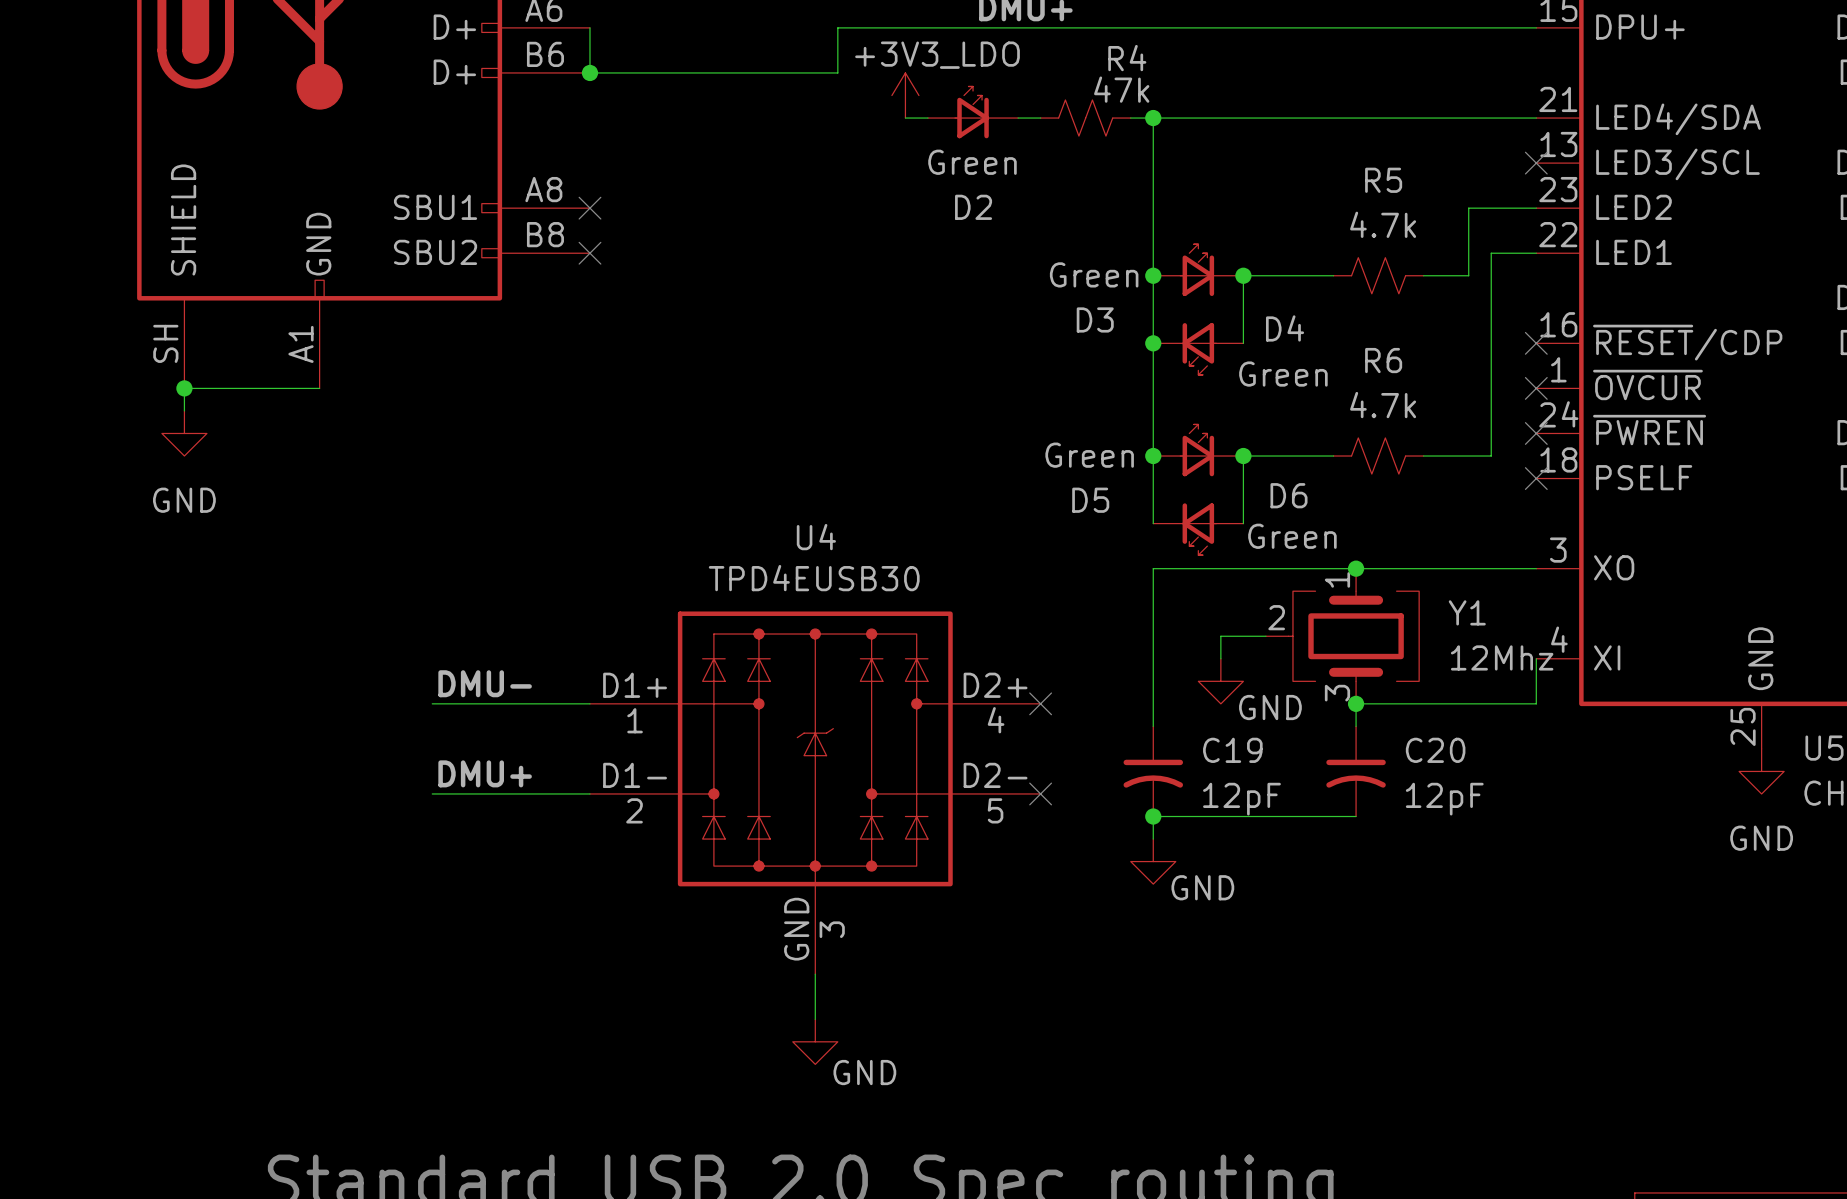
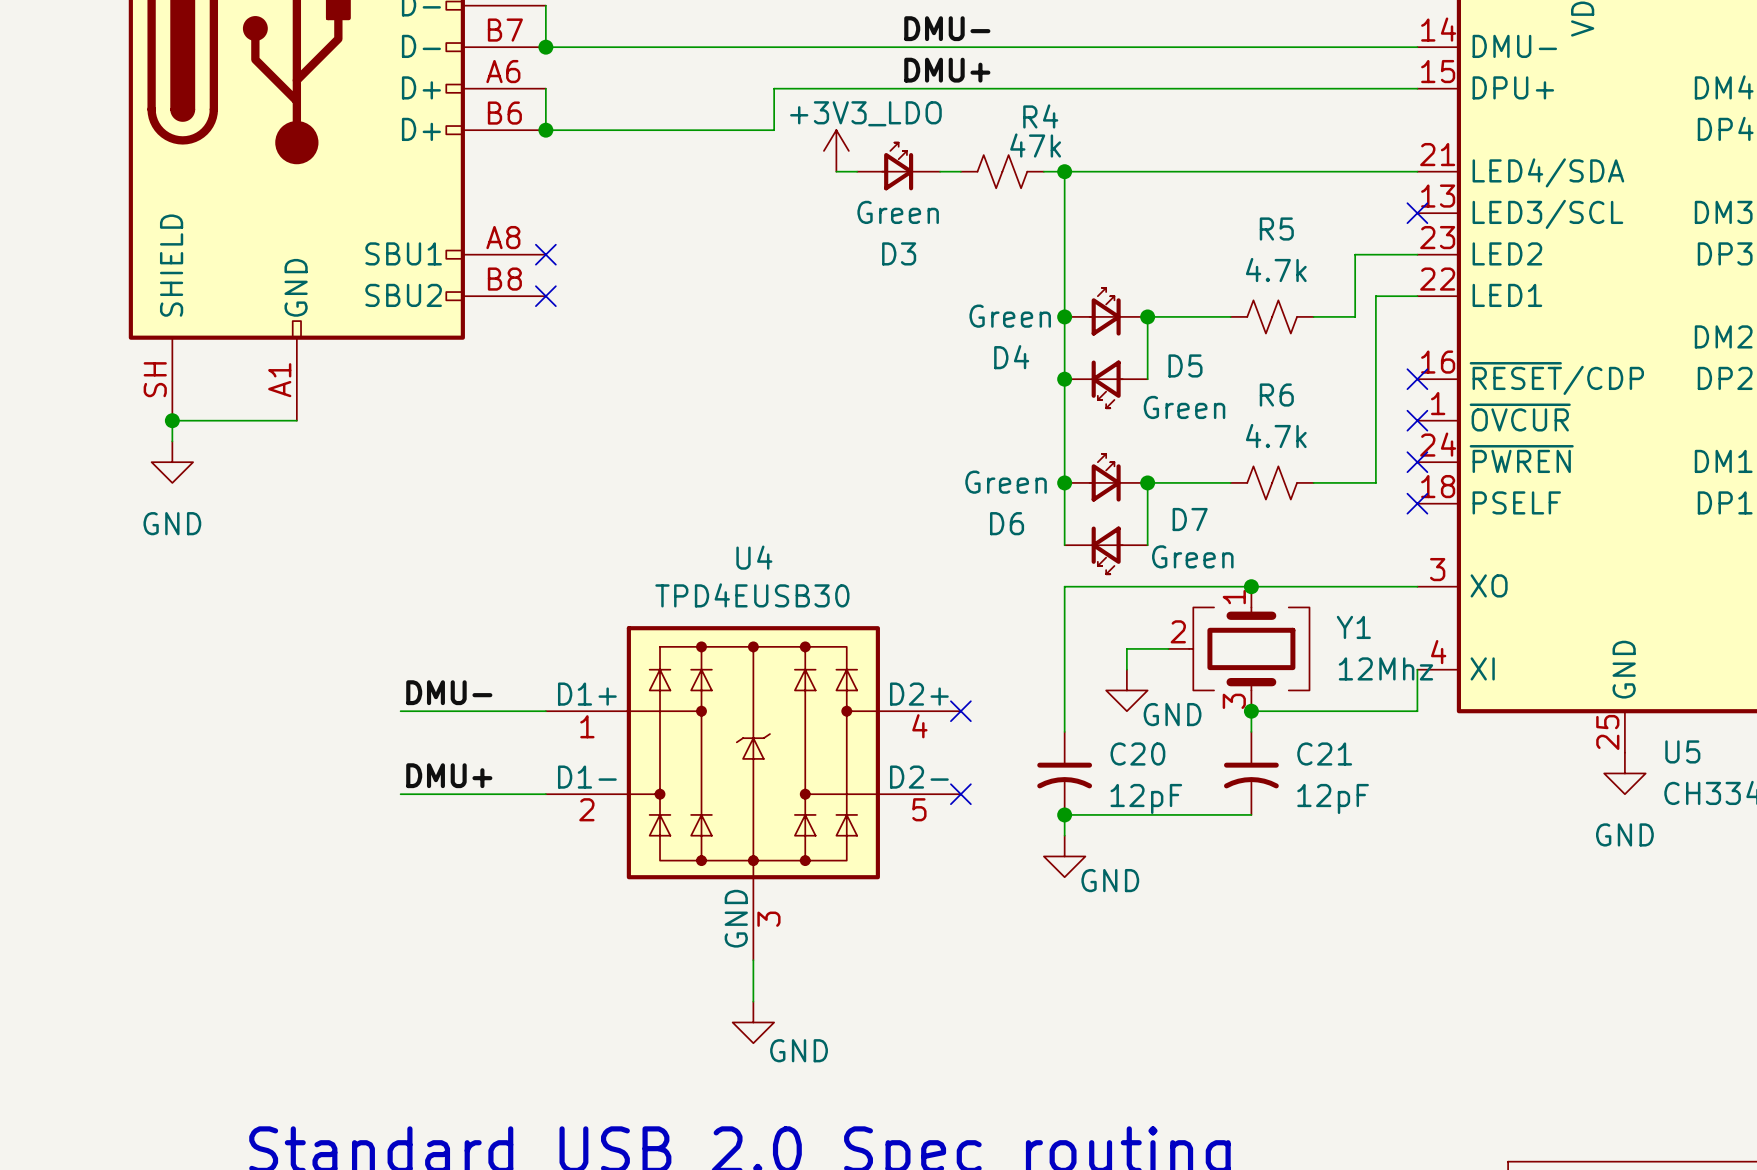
D2 name: D2 (973, 207) -> D3 (899, 253)
D3 name: D3 (1095, 319) -> D4 (1011, 357)
D4 name: D4 (1285, 328) -> D5 (1185, 365)
D6 name: D6 (1289, 495) -> D7 (1190, 519)
D5 name: D5 (1090, 500) -> D6 (1007, 523)
C19 name: C19 (1232, 750) -> C20 (1137, 754)
C20 name: C20 (1435, 750) -> C21 (1324, 754)

